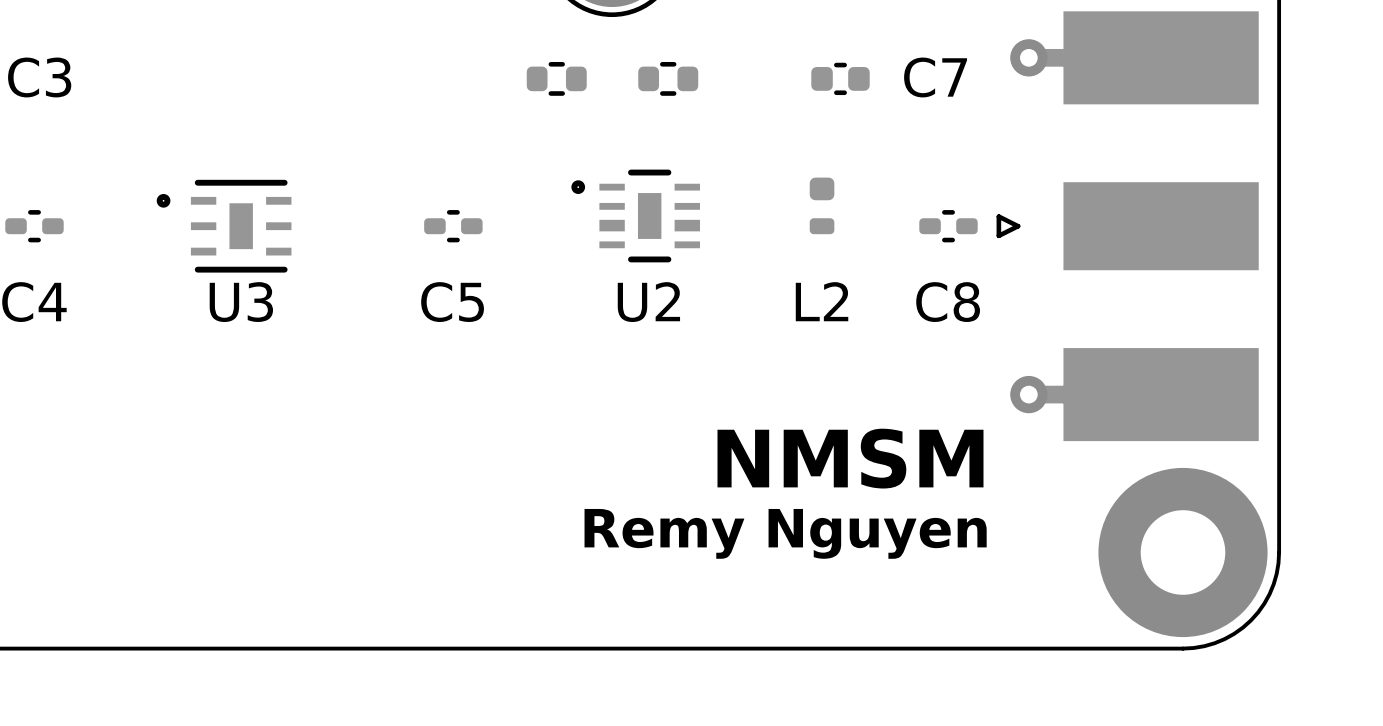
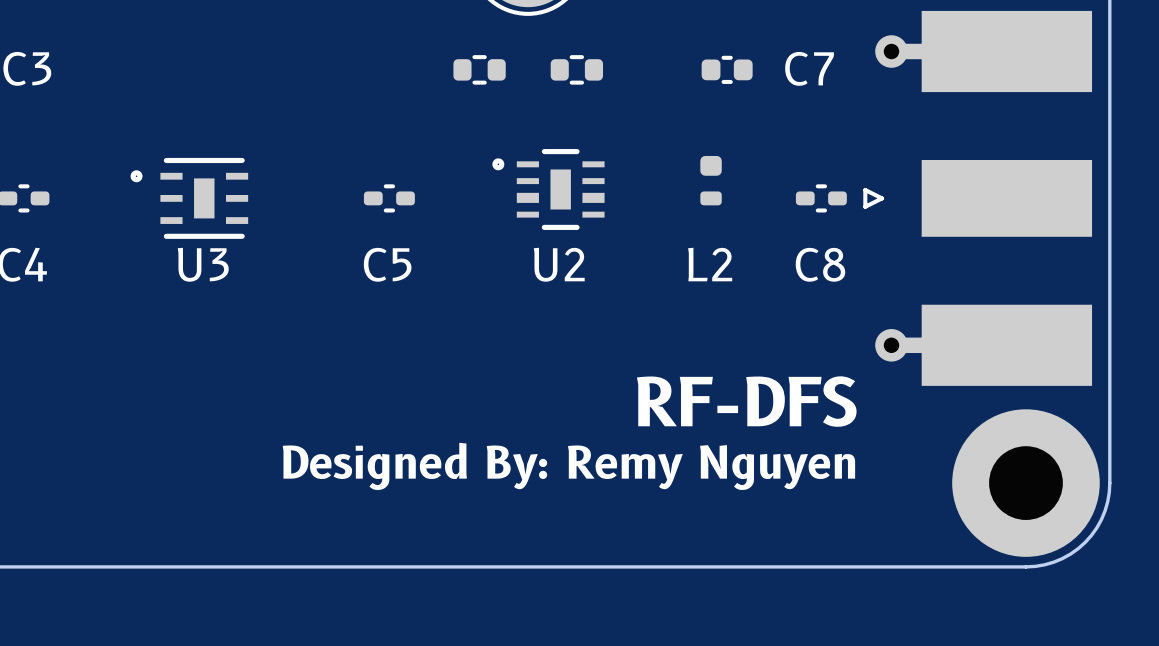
text: NMSM (850, 458) -> RF-DFS (746, 401)
text: Remy Nguyen (785, 533) -> Designed By: Remy Nguyen (568, 466)

